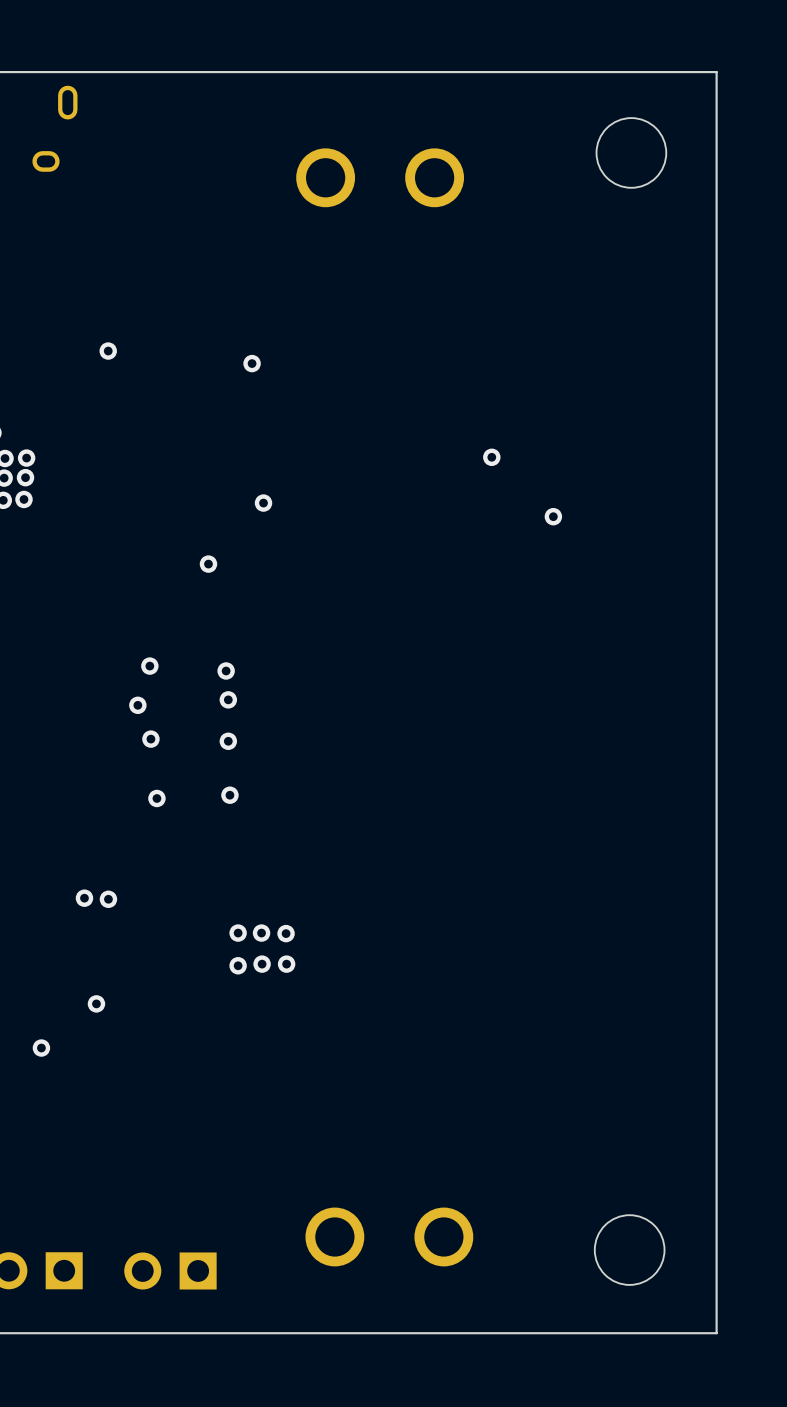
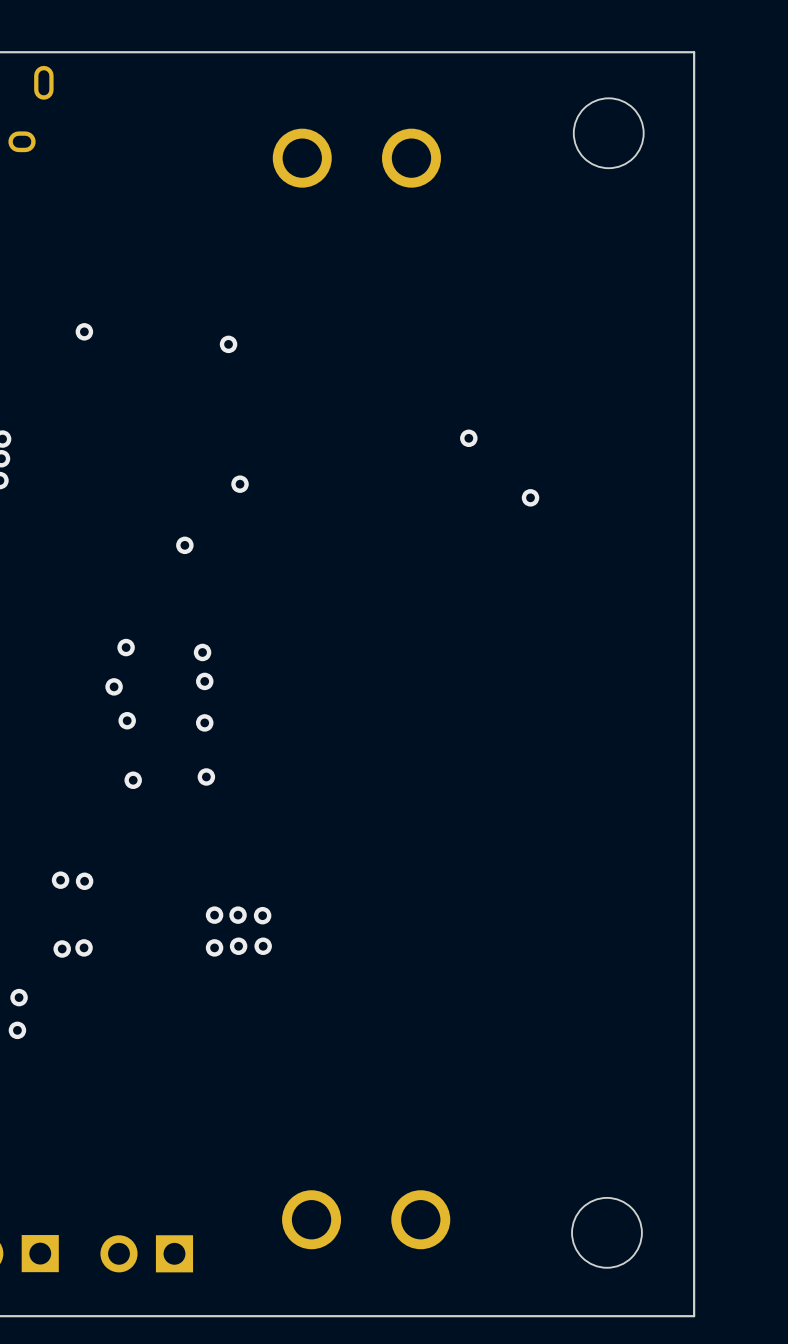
via: none -> (84, 947)
via: none -> (62, 948)
via: (96, 1003) -> none
via: none -> (19, 997)

